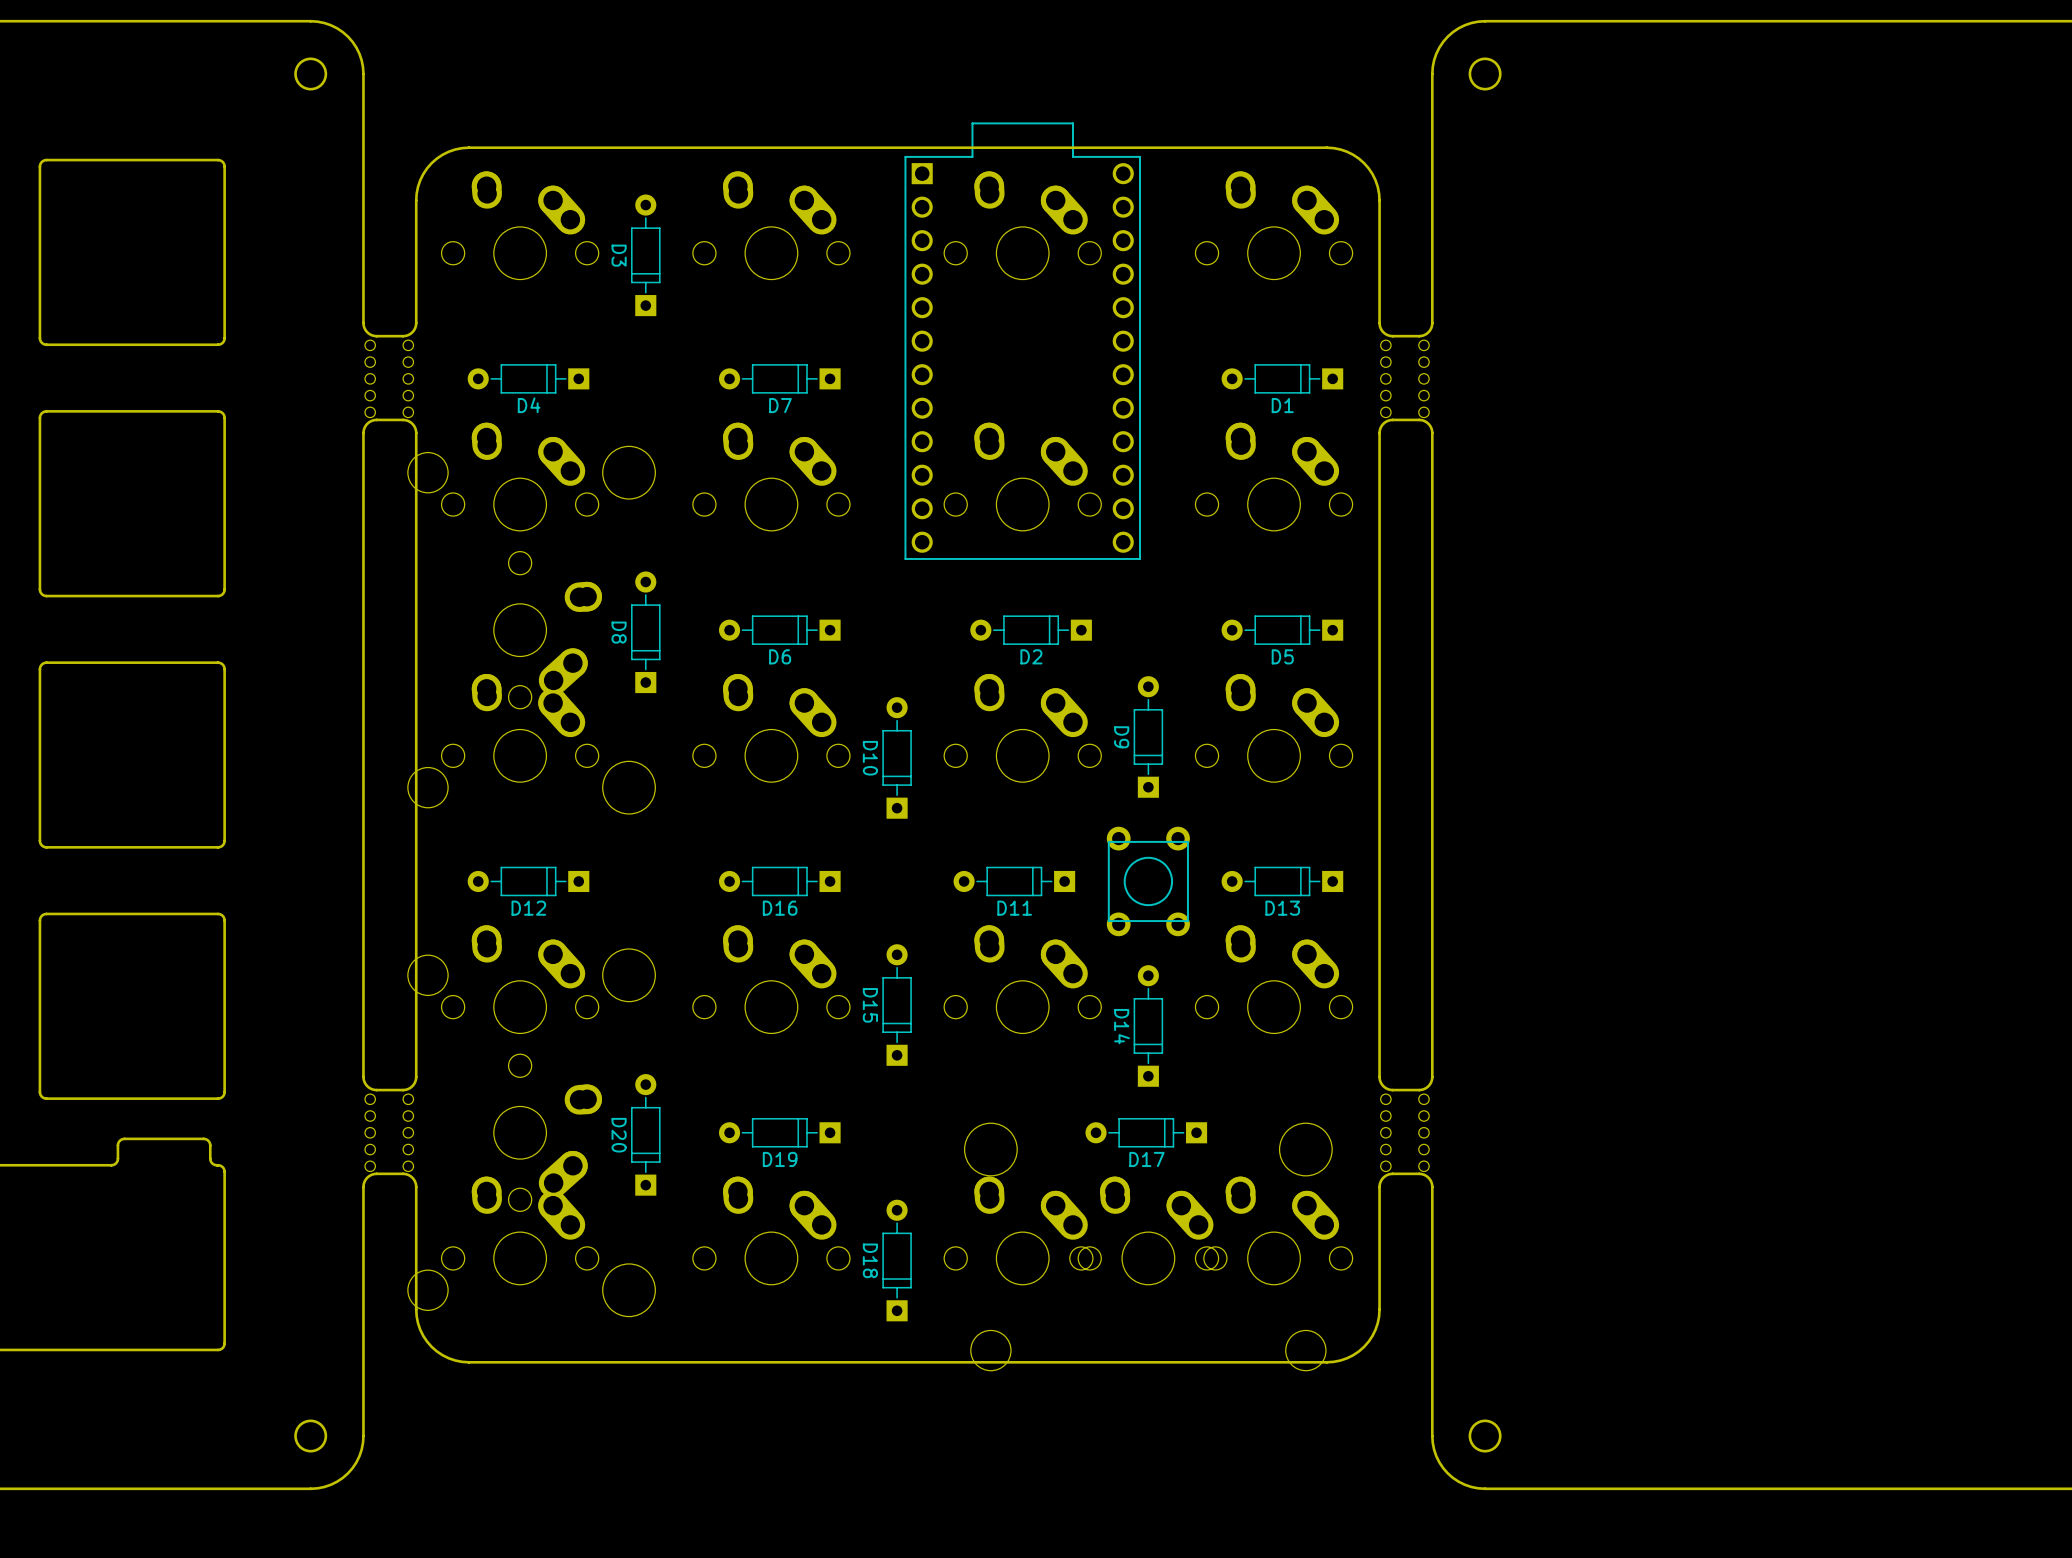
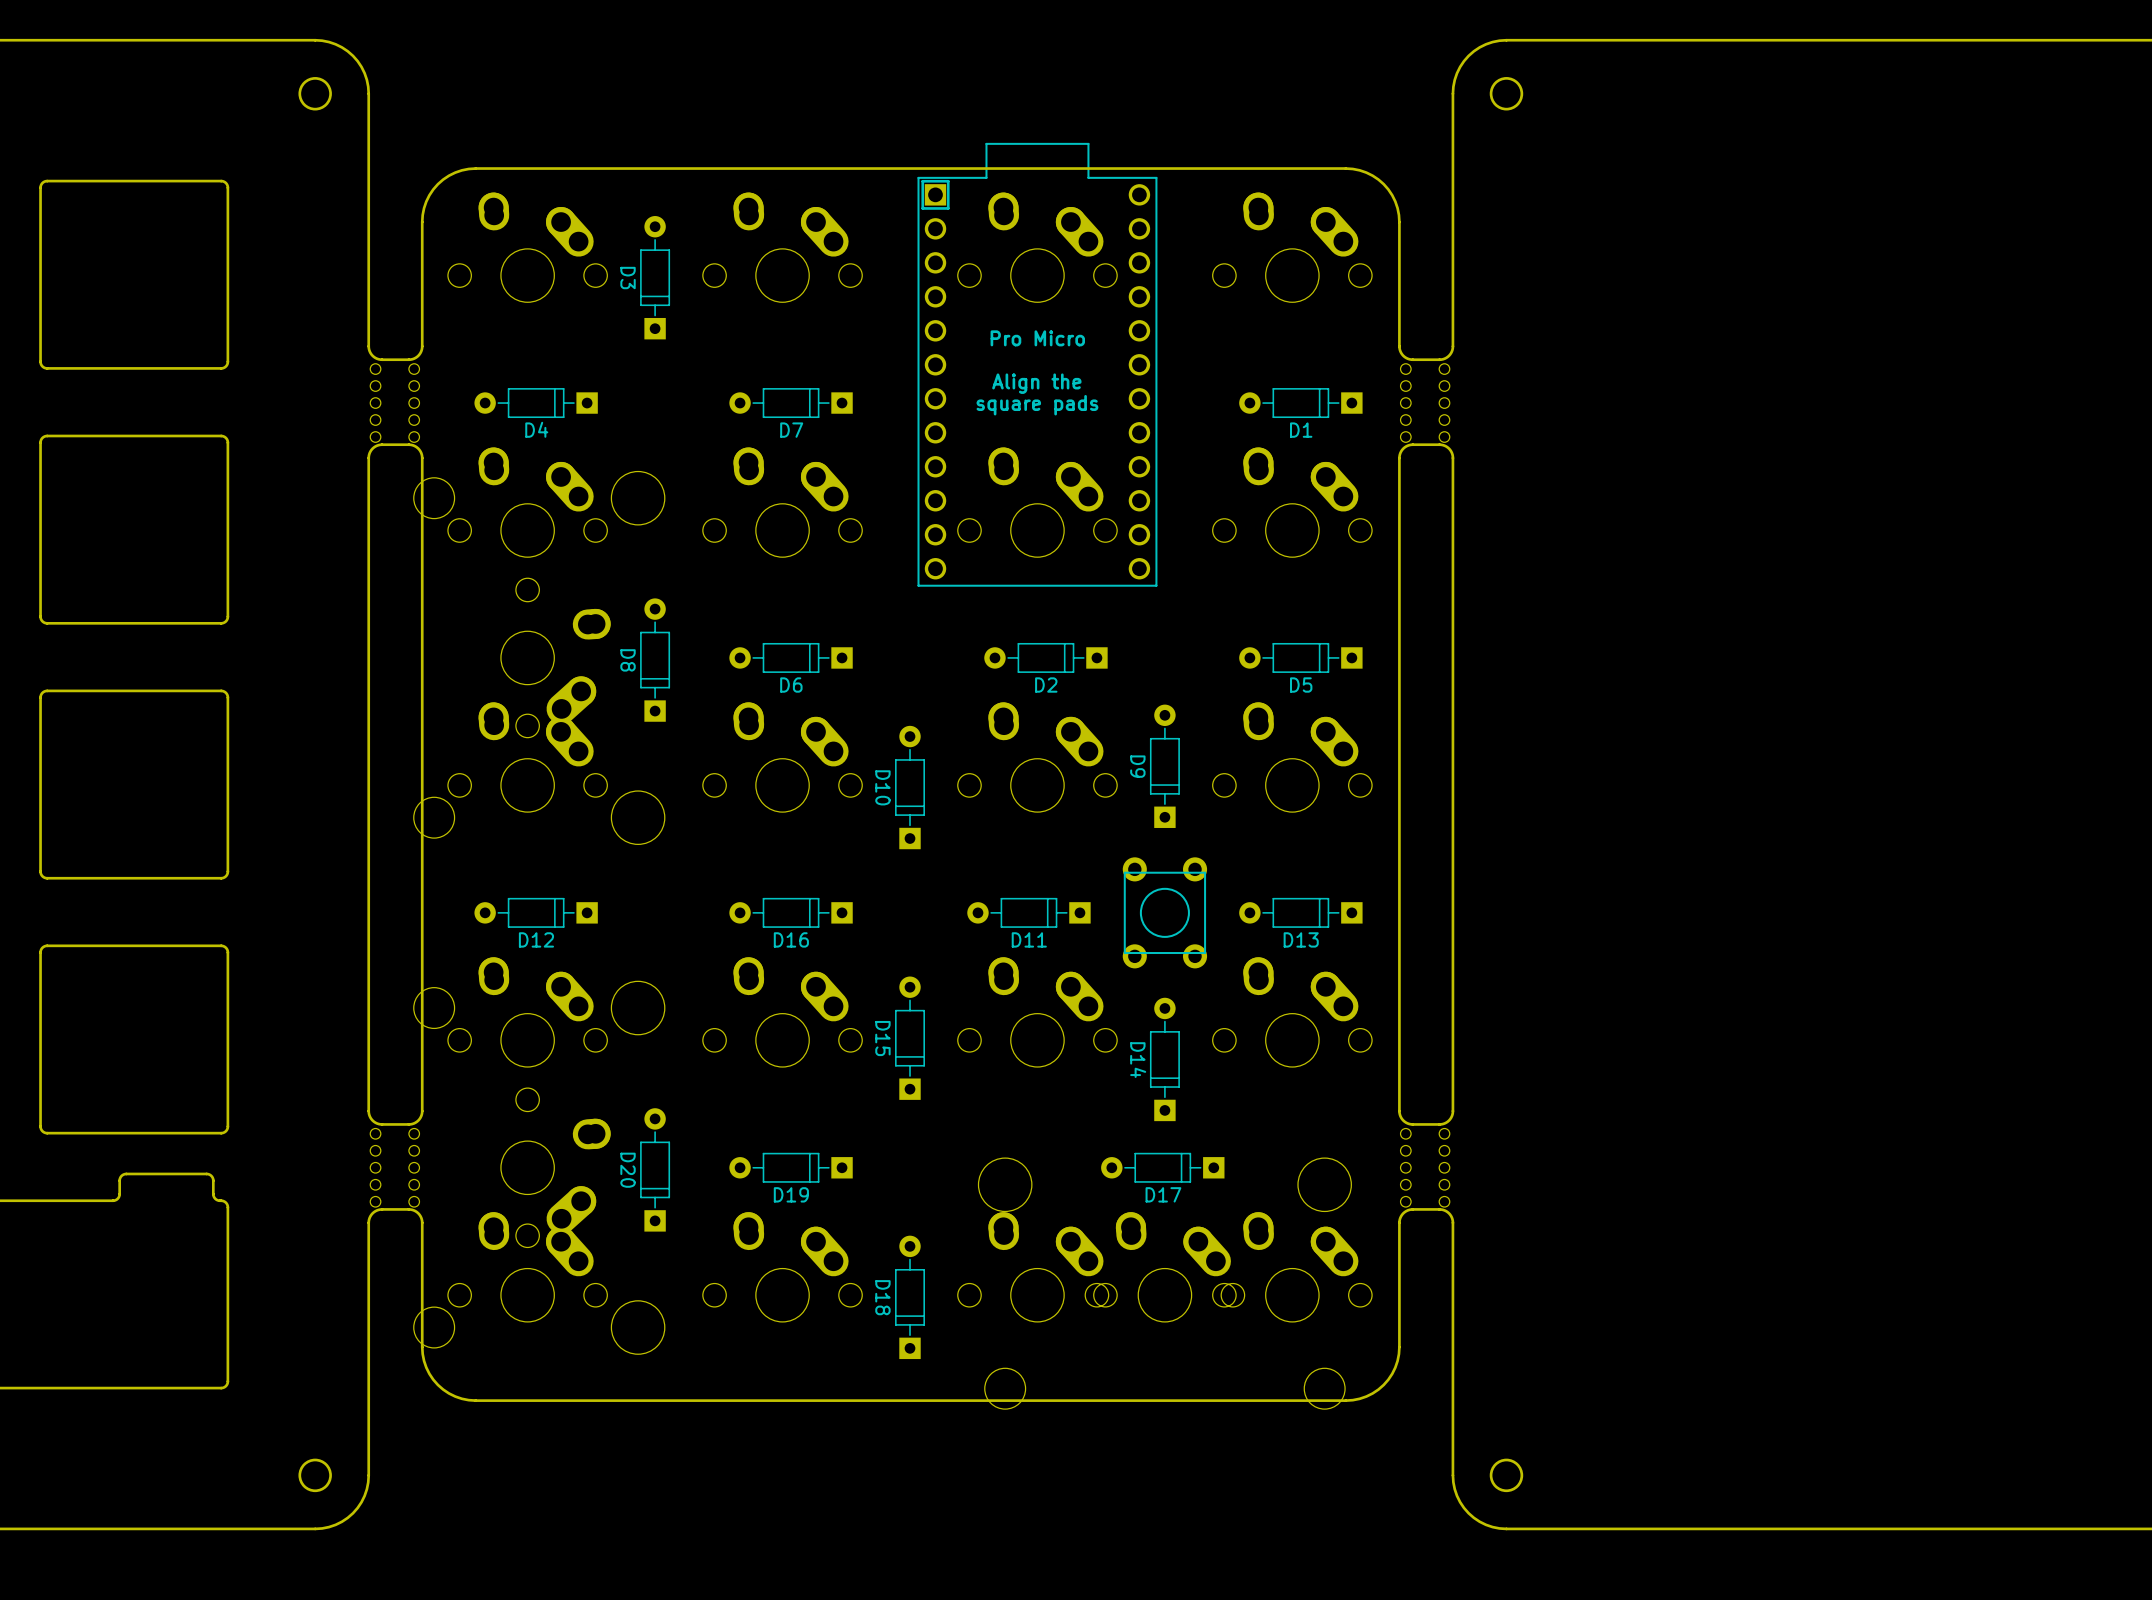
line: none -> (948, 181) (922, 181) (922, 208) (948, 208) (948, 181)
text: none -> Pro Micro (1037, 338)
text: none -> Align the (1036, 383)
text: none -> square pads (1037, 405)

